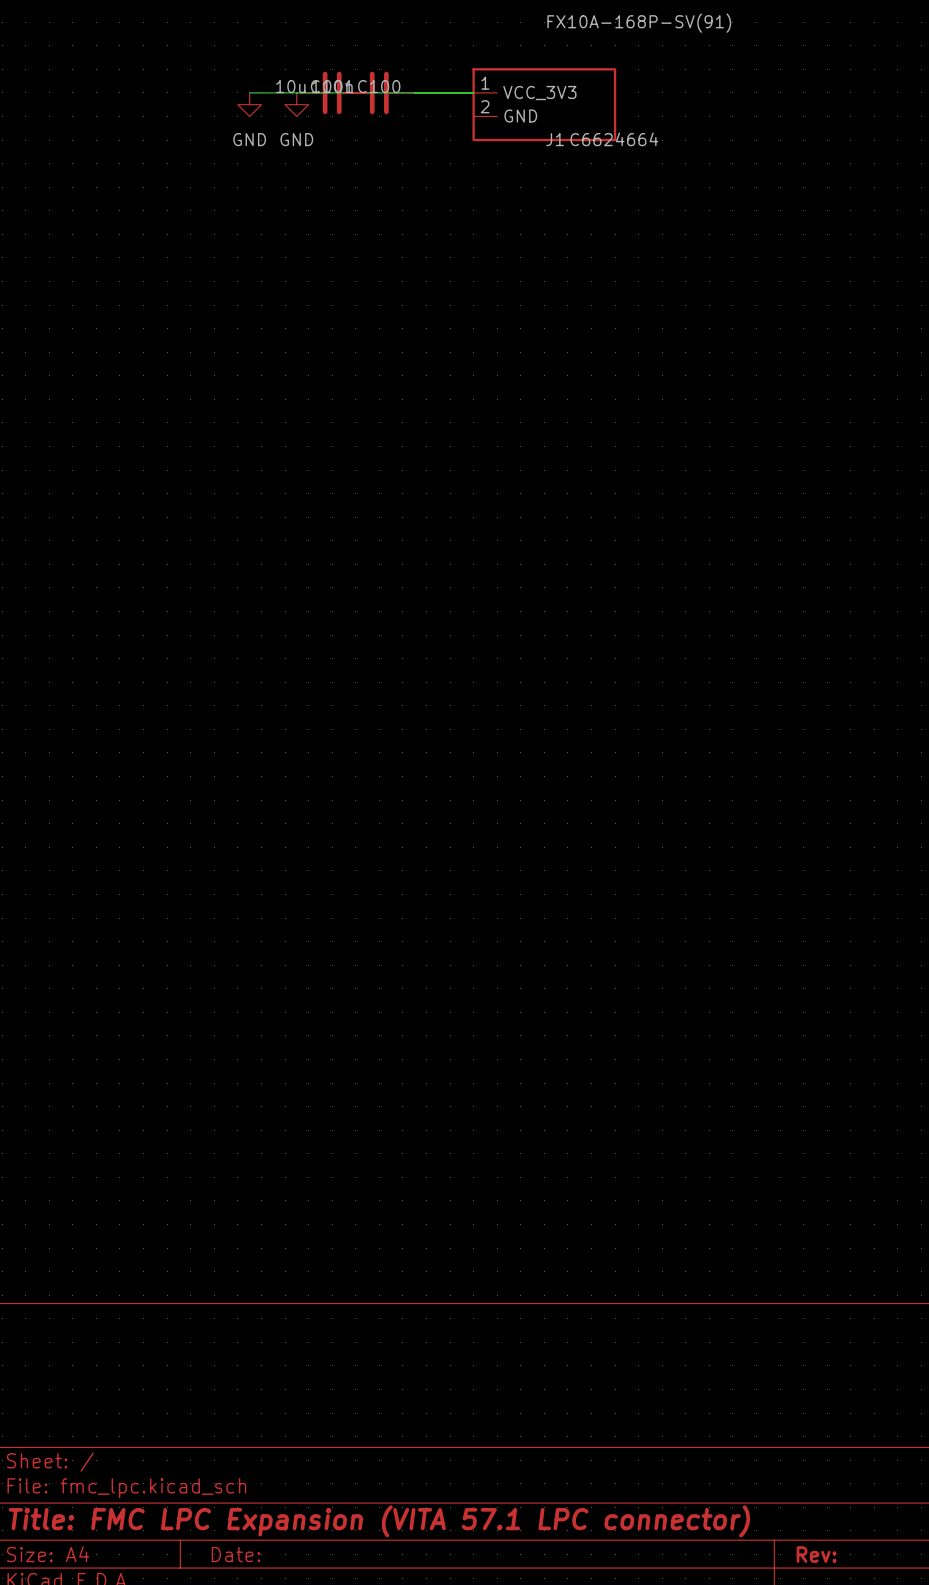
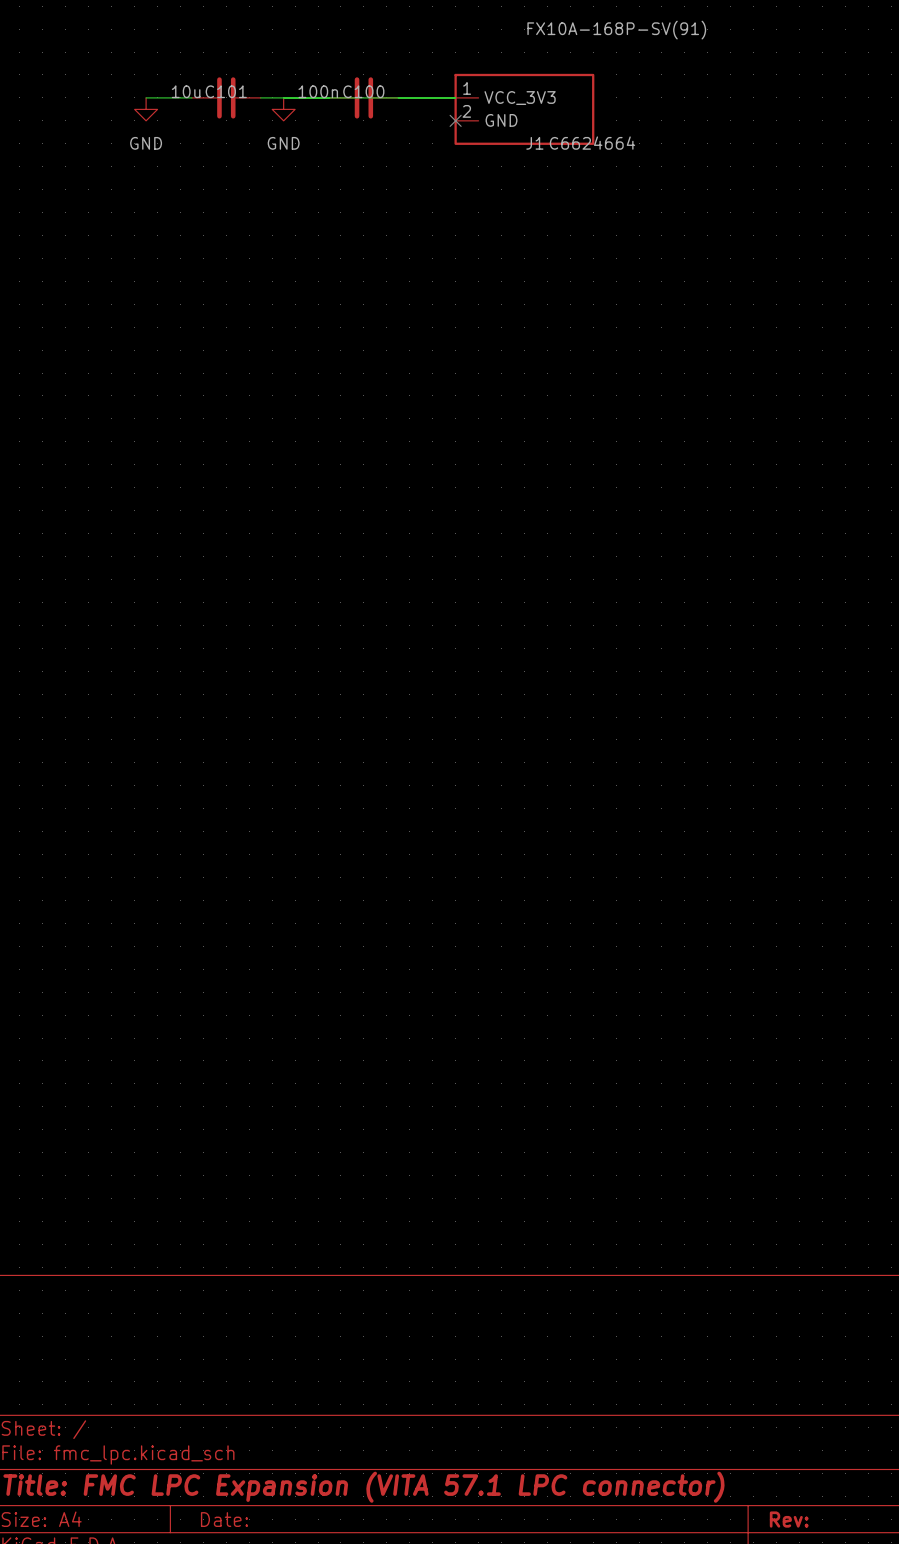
wire: none -> (146, 97) (191, 97)
C101 position: (332, 92) -> (226, 97)
power symbol position: GND (249, 104) -> GND (146, 109)
no-connect mark: none -> (455, 120)

